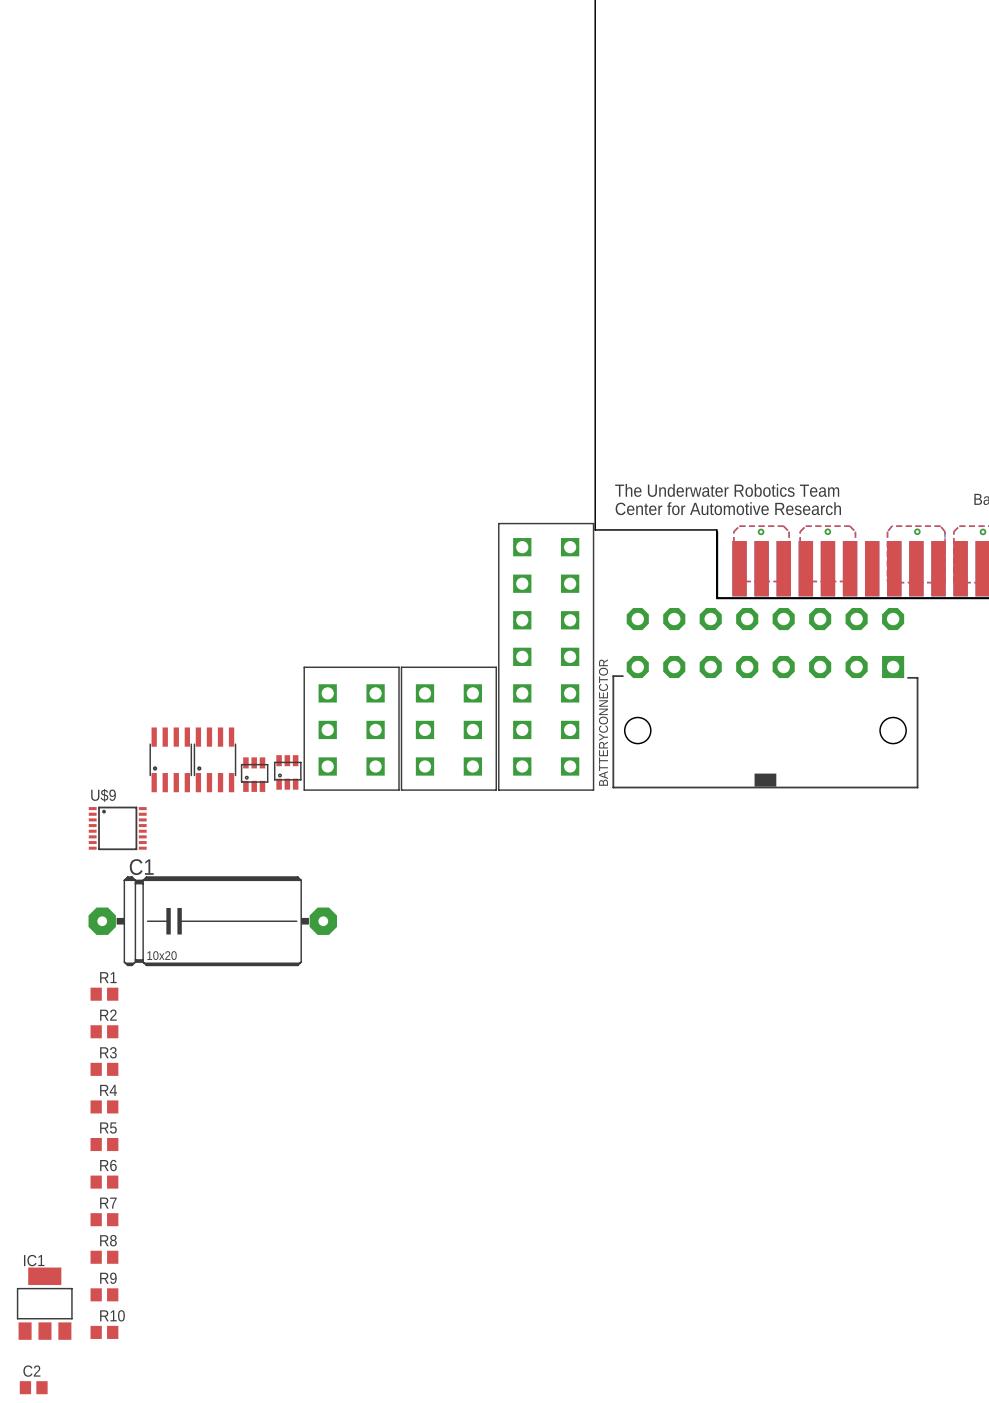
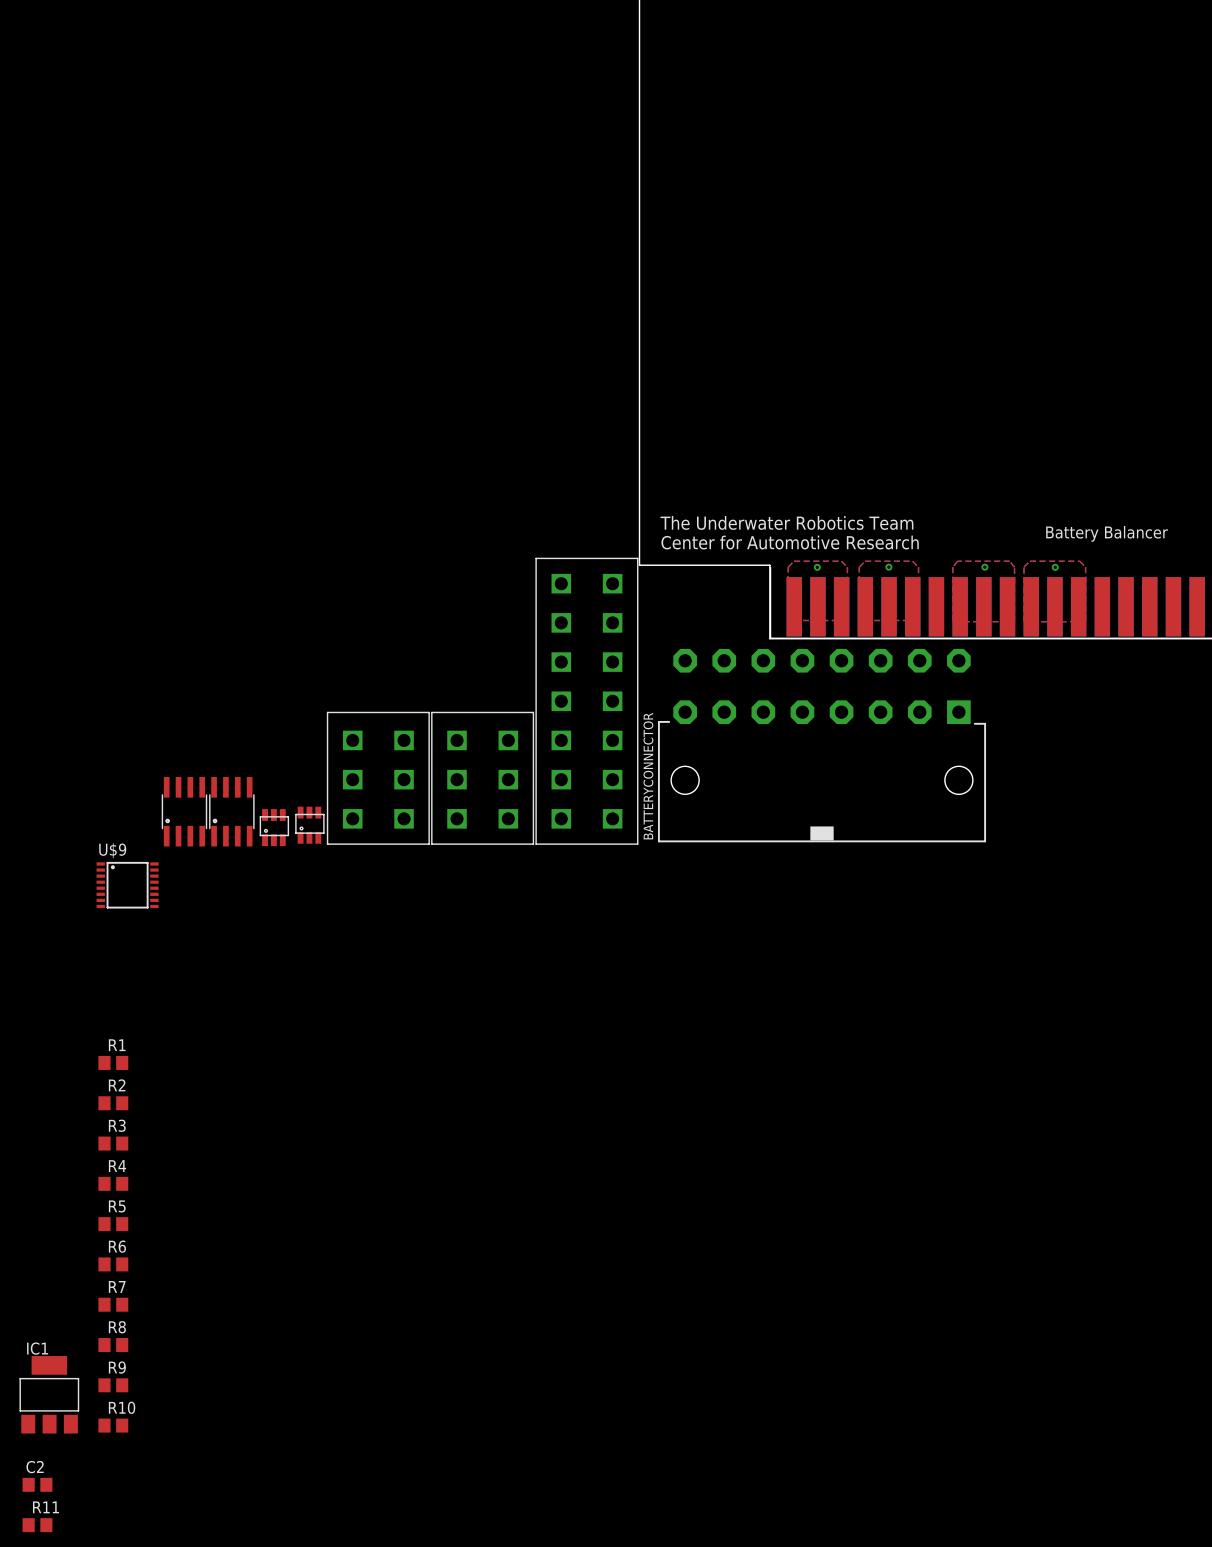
C1: (212, 921) -> none

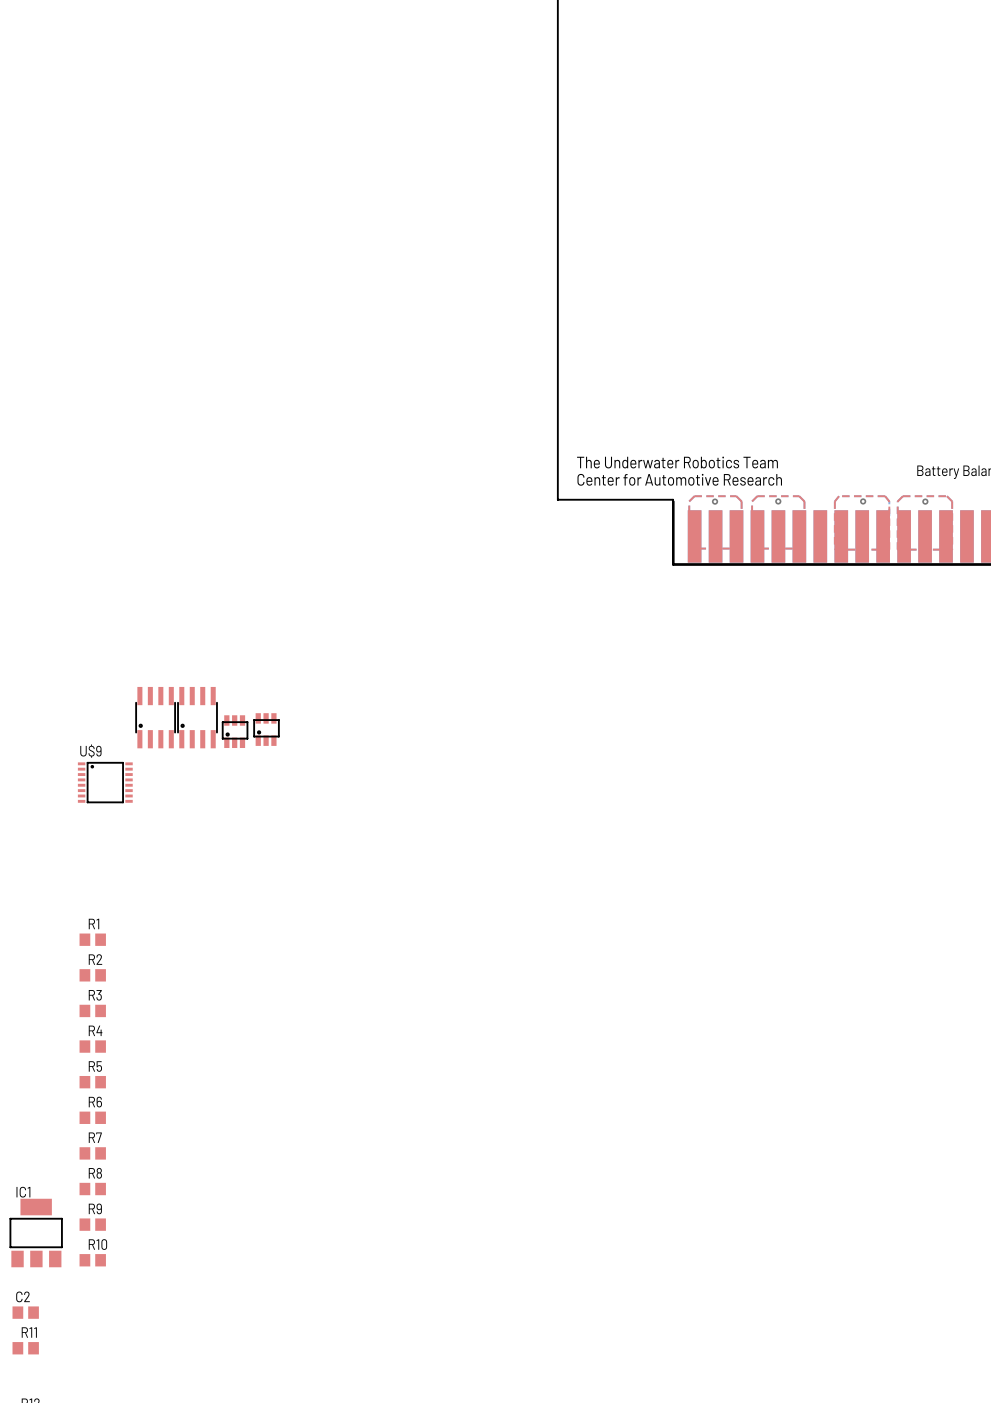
part: (586, 701) -> none
BATTERYCONNECTOR: (822, 745) -> none
part: (378, 778) -> none
part: (482, 778) -> none

